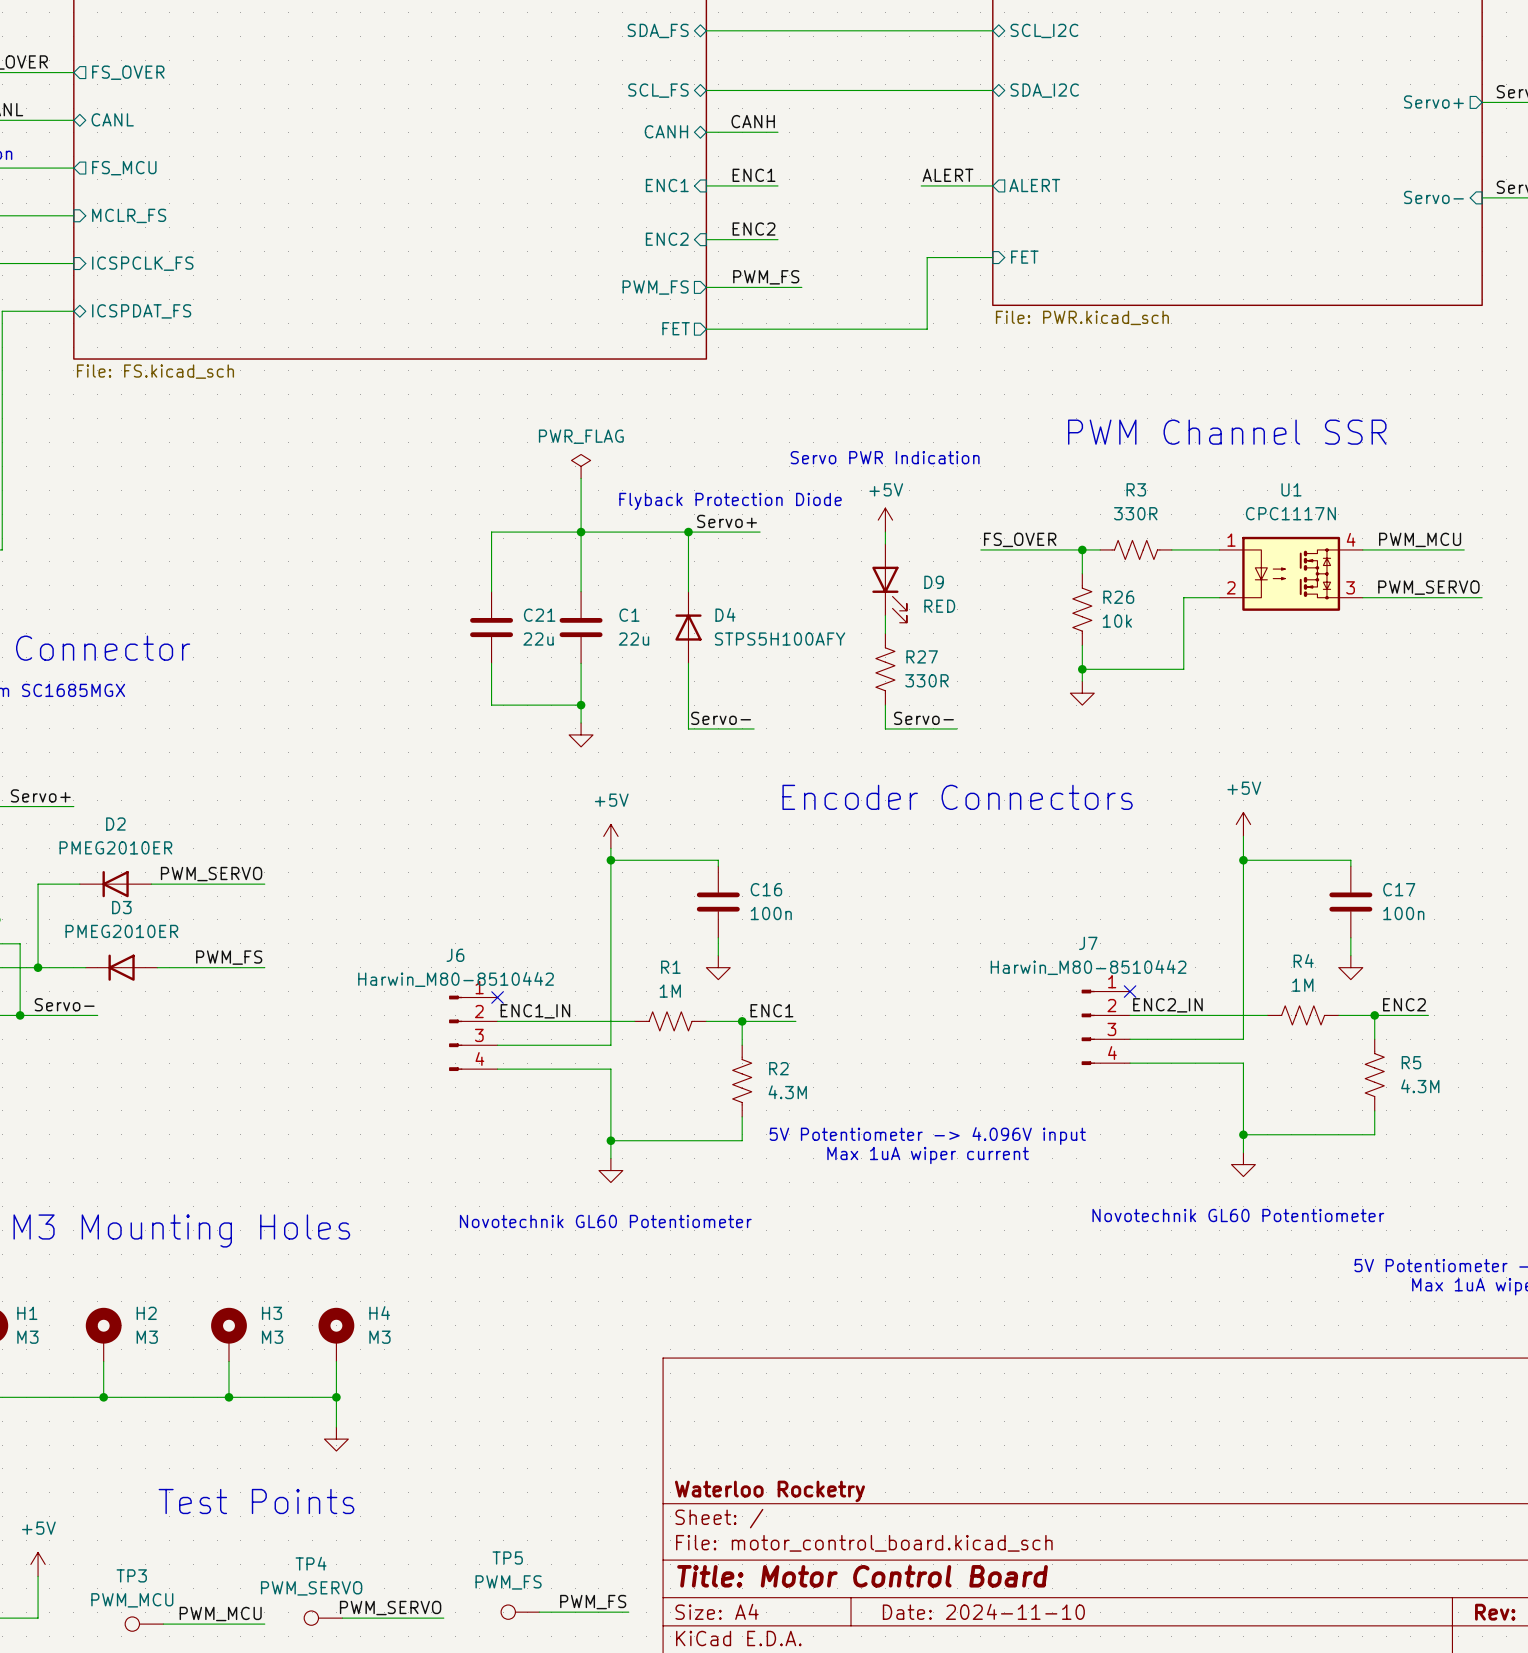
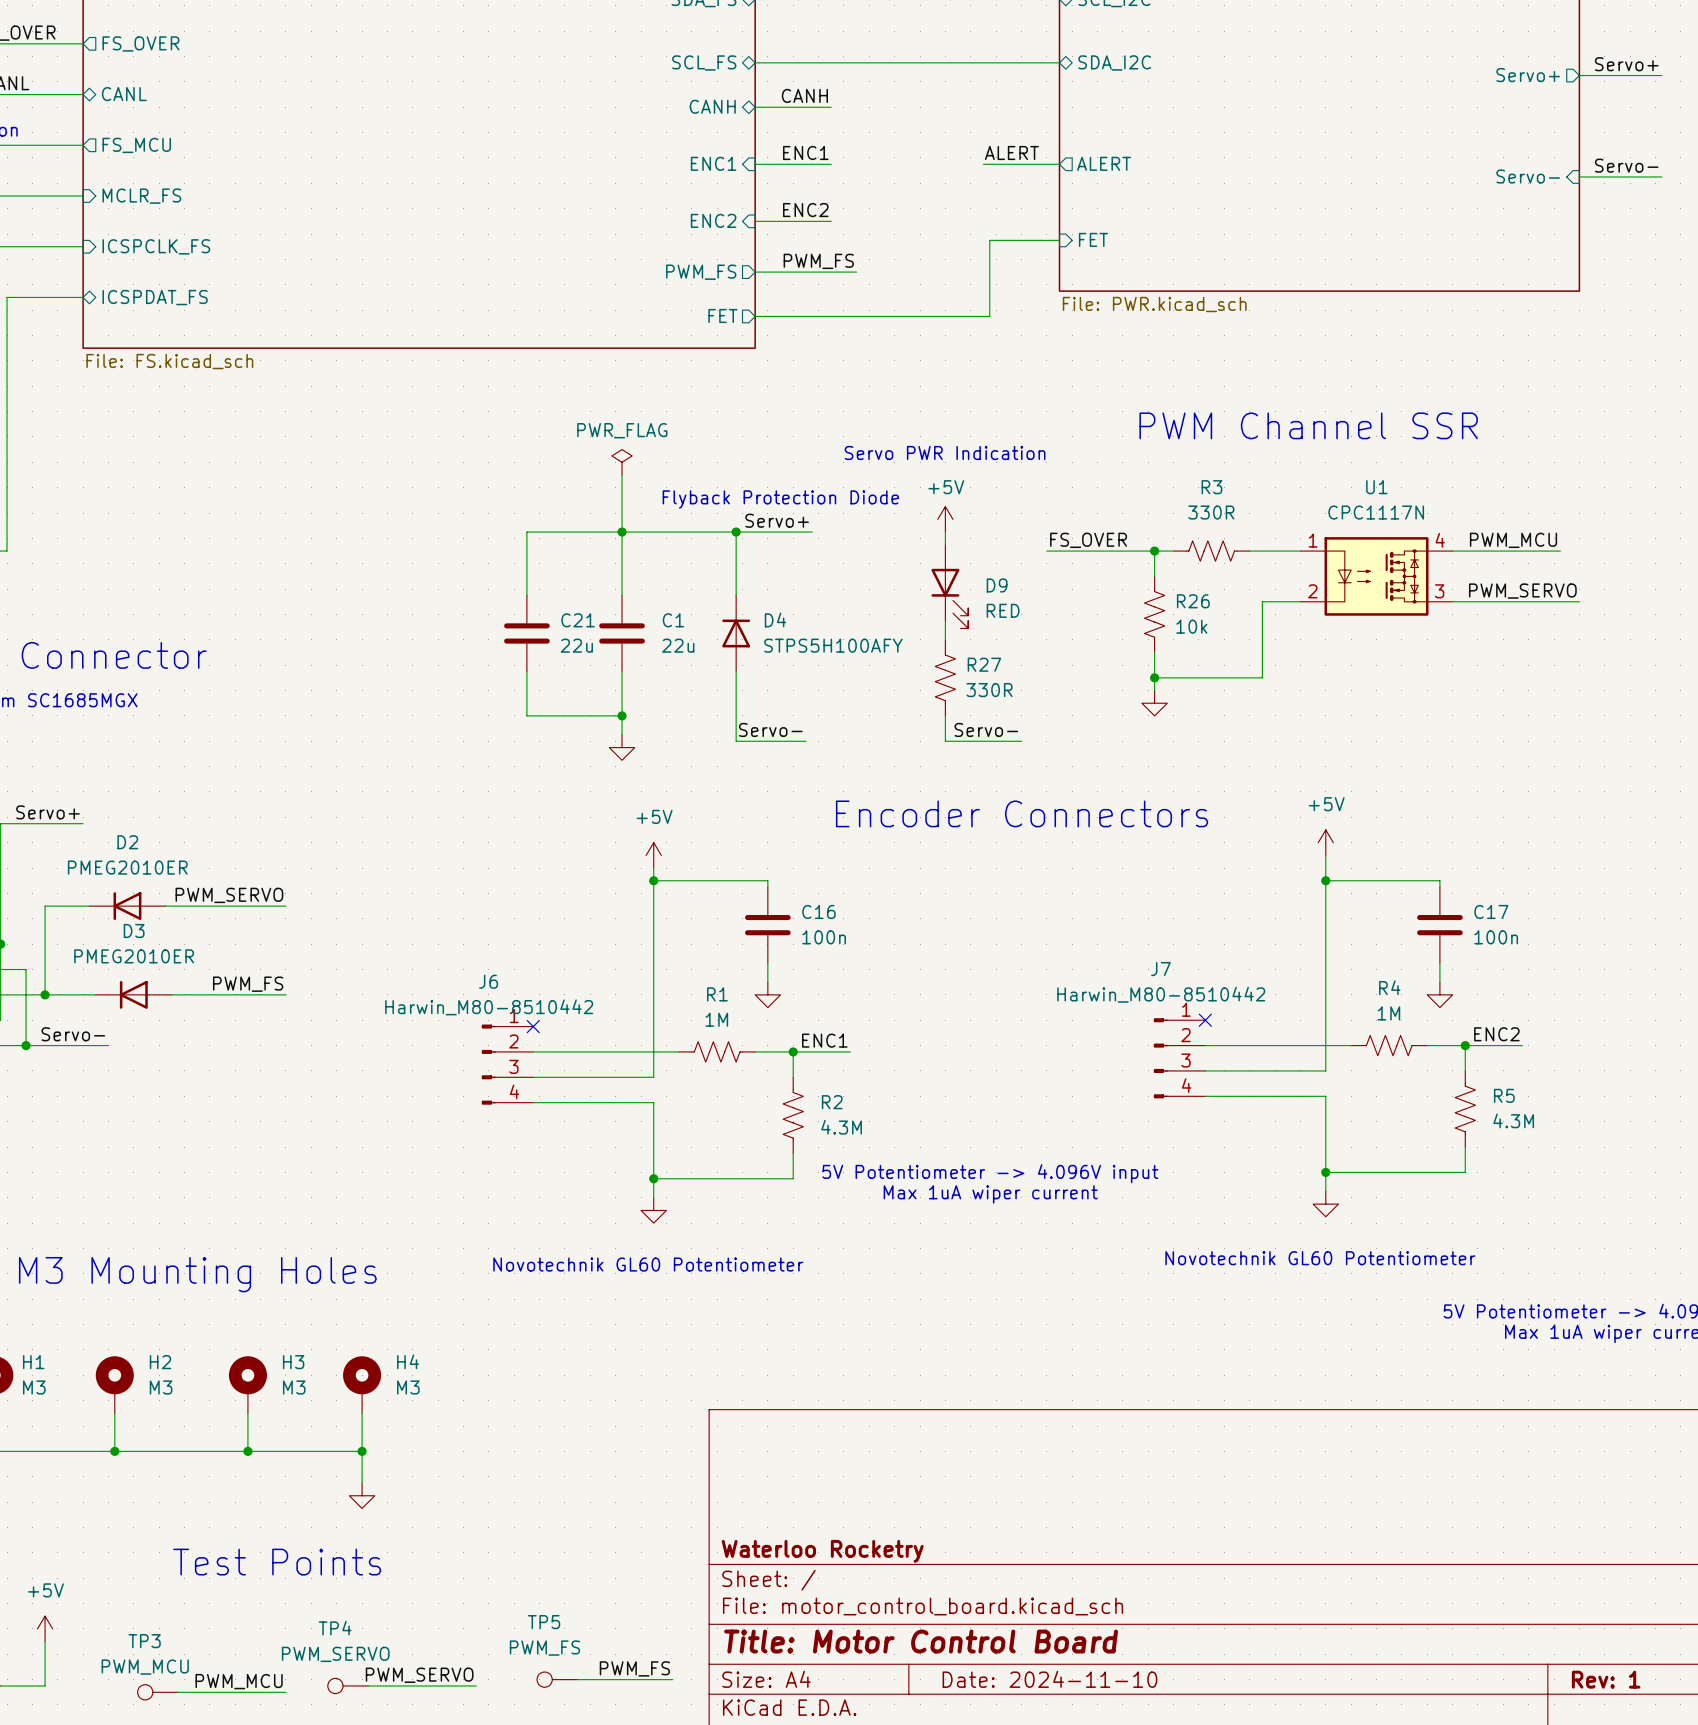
label: ENC2_IN (1167, 1005) -> none
label: ENC1_IN (535, 1011) -> none

